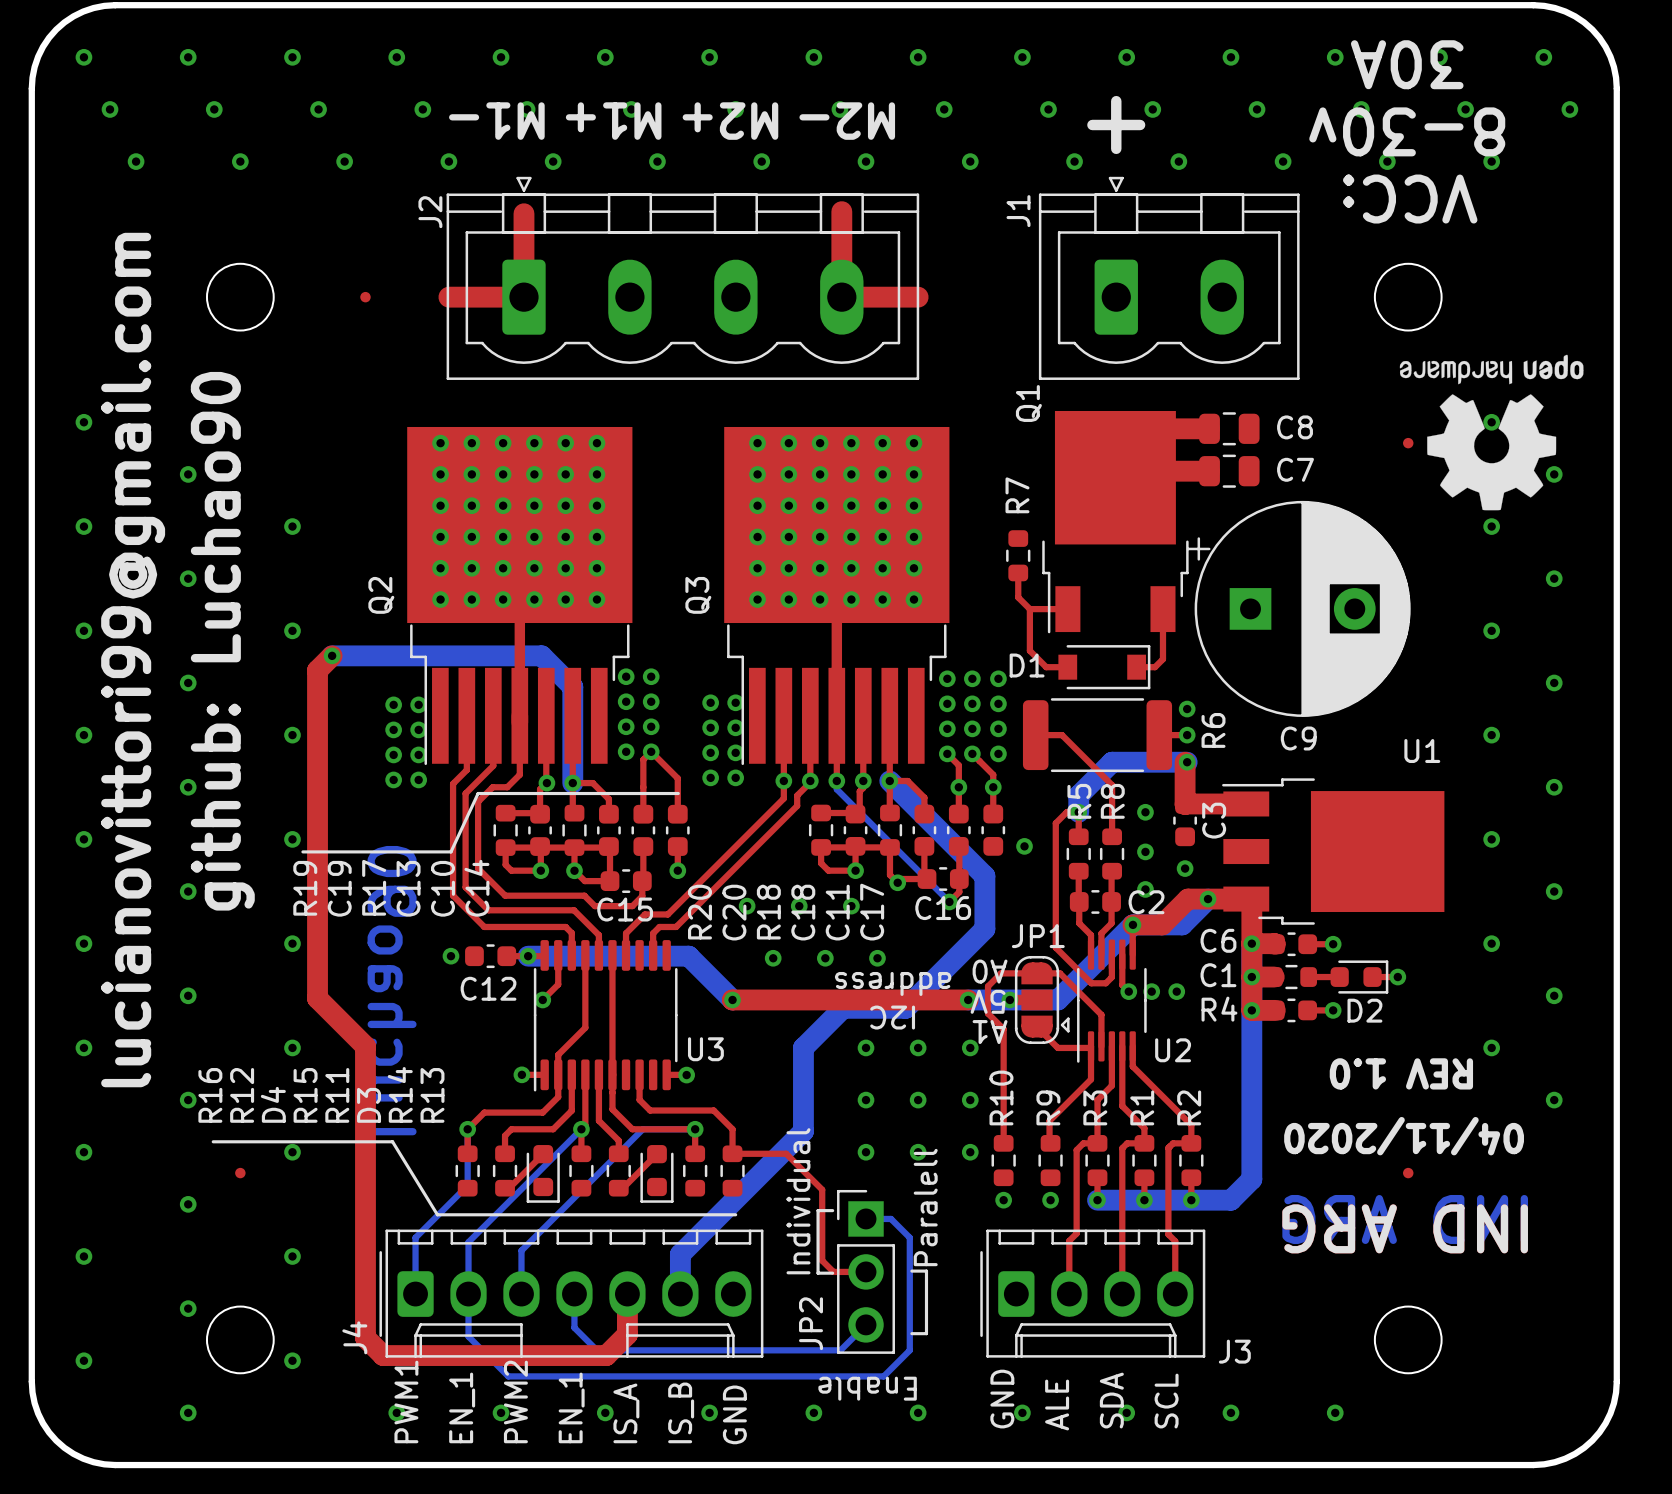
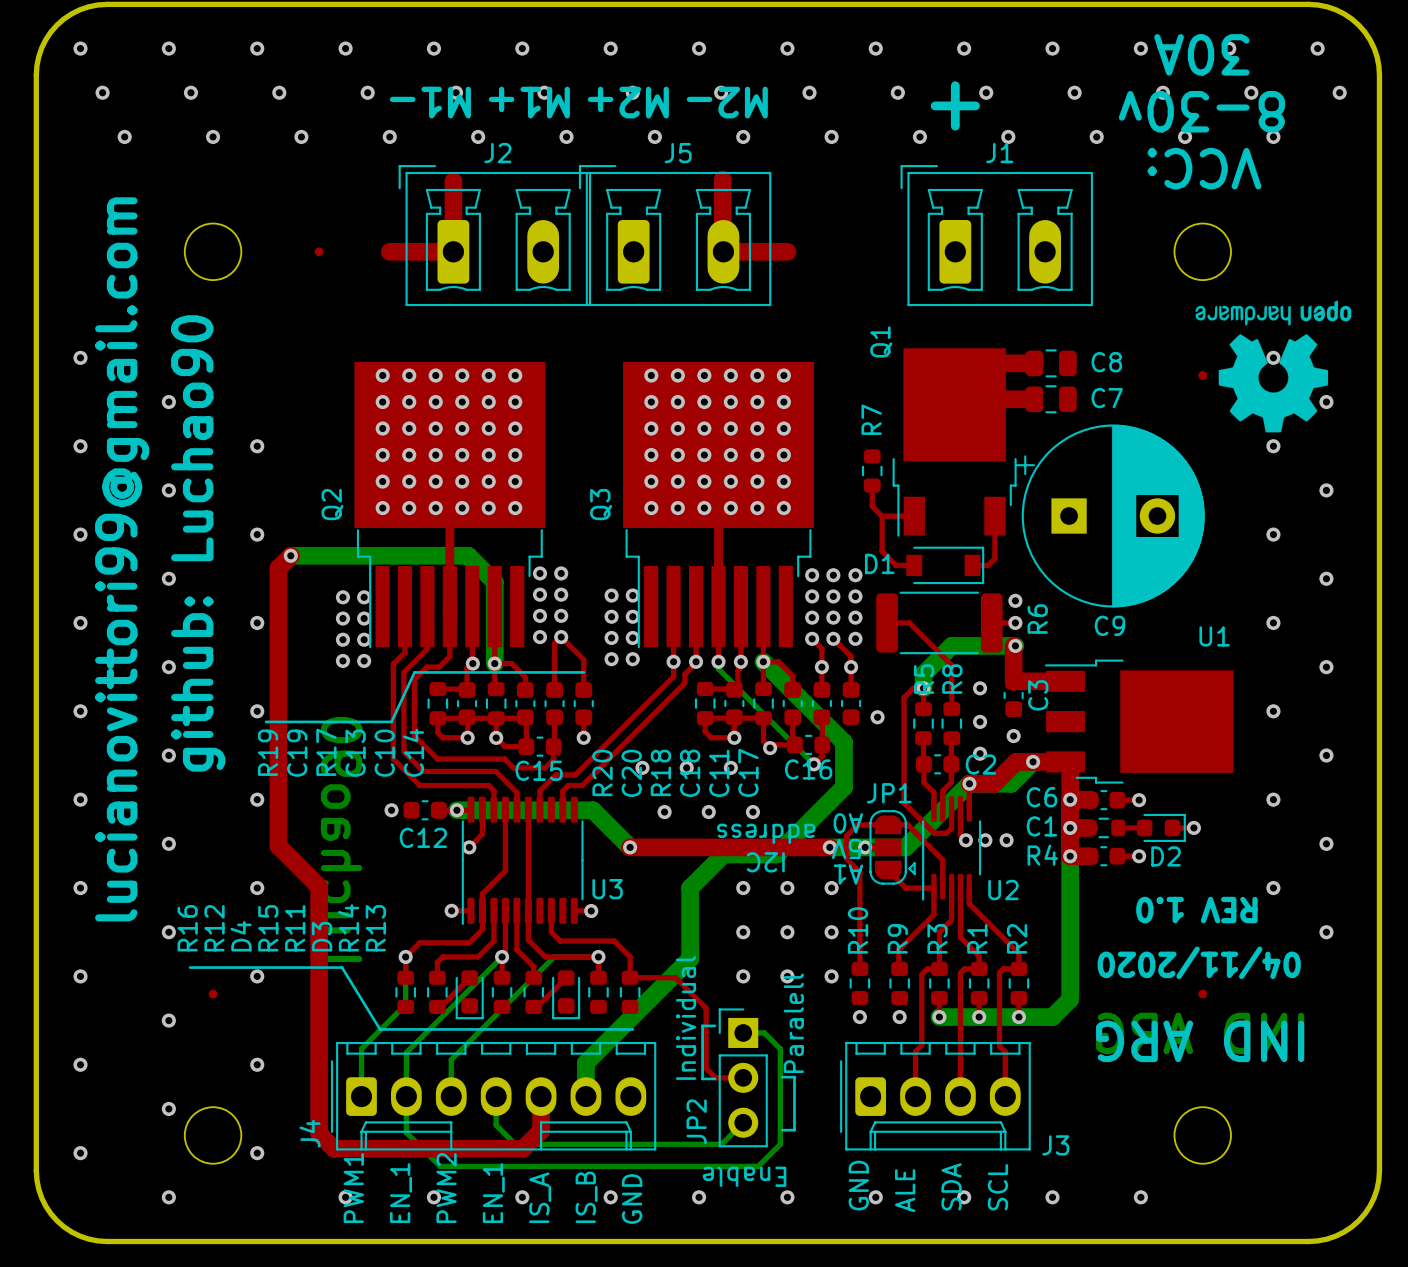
J2 footprint: [446, 176, 920, 380] -> [398, 165, 592, 307]
J1 footprint: [1038, 176, 1300, 380] -> [900, 165, 1093, 307]
J1 name position: J1 (1018, 211) -> J1 (999, 153)
J2 name position: J2 (430, 212) -> J2 (497, 153)
J5: none -> (675, 235)

